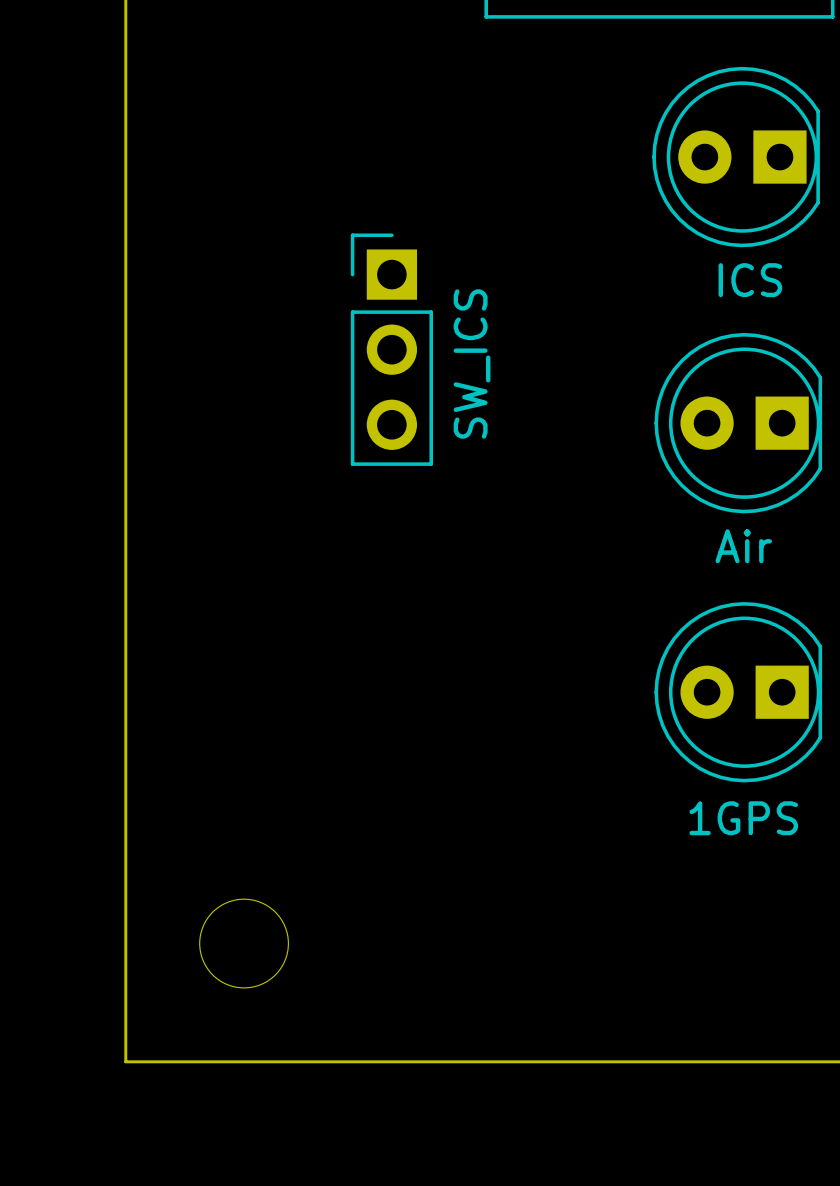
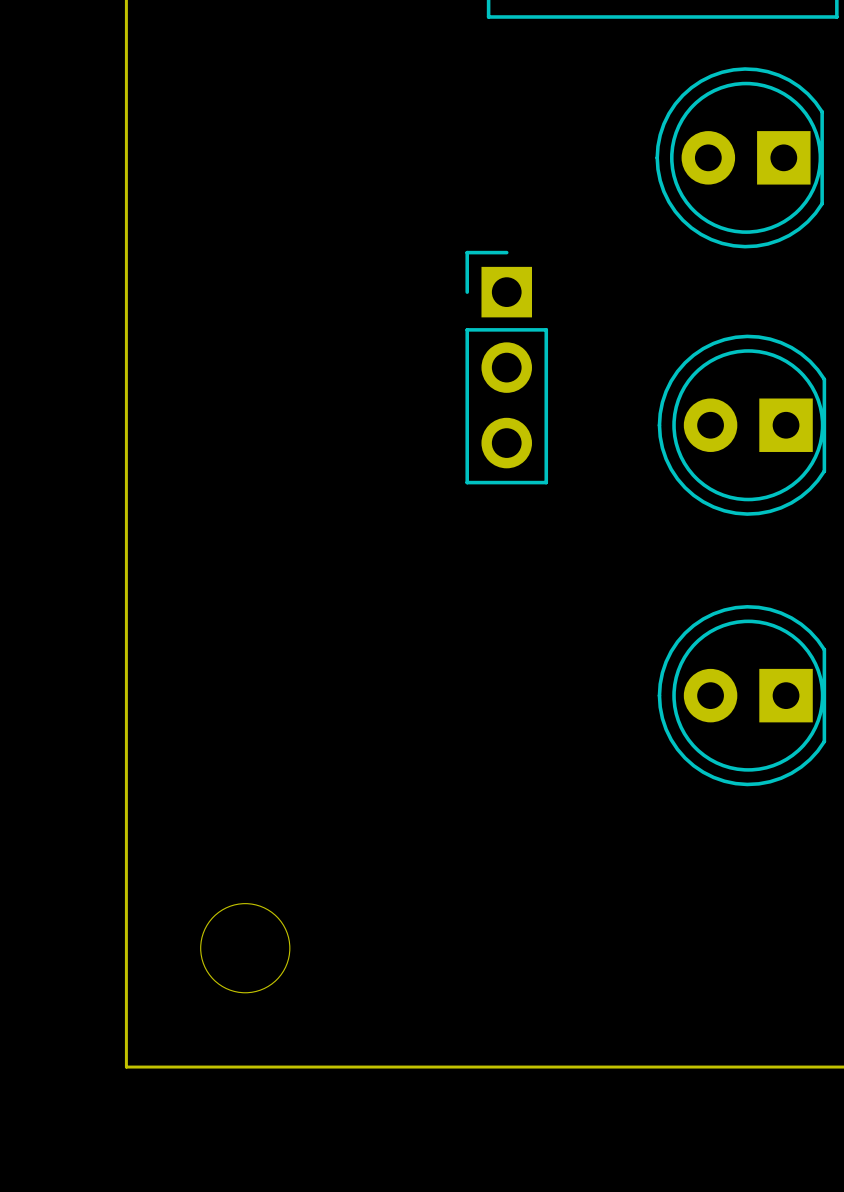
part value: ICS (750, 280) -> none
part: SW_ICS (391, 349) -> none
part: none -> (506, 367)
part value: Air (743, 546) -> none
part value: 1GPS (743, 818) -> none

